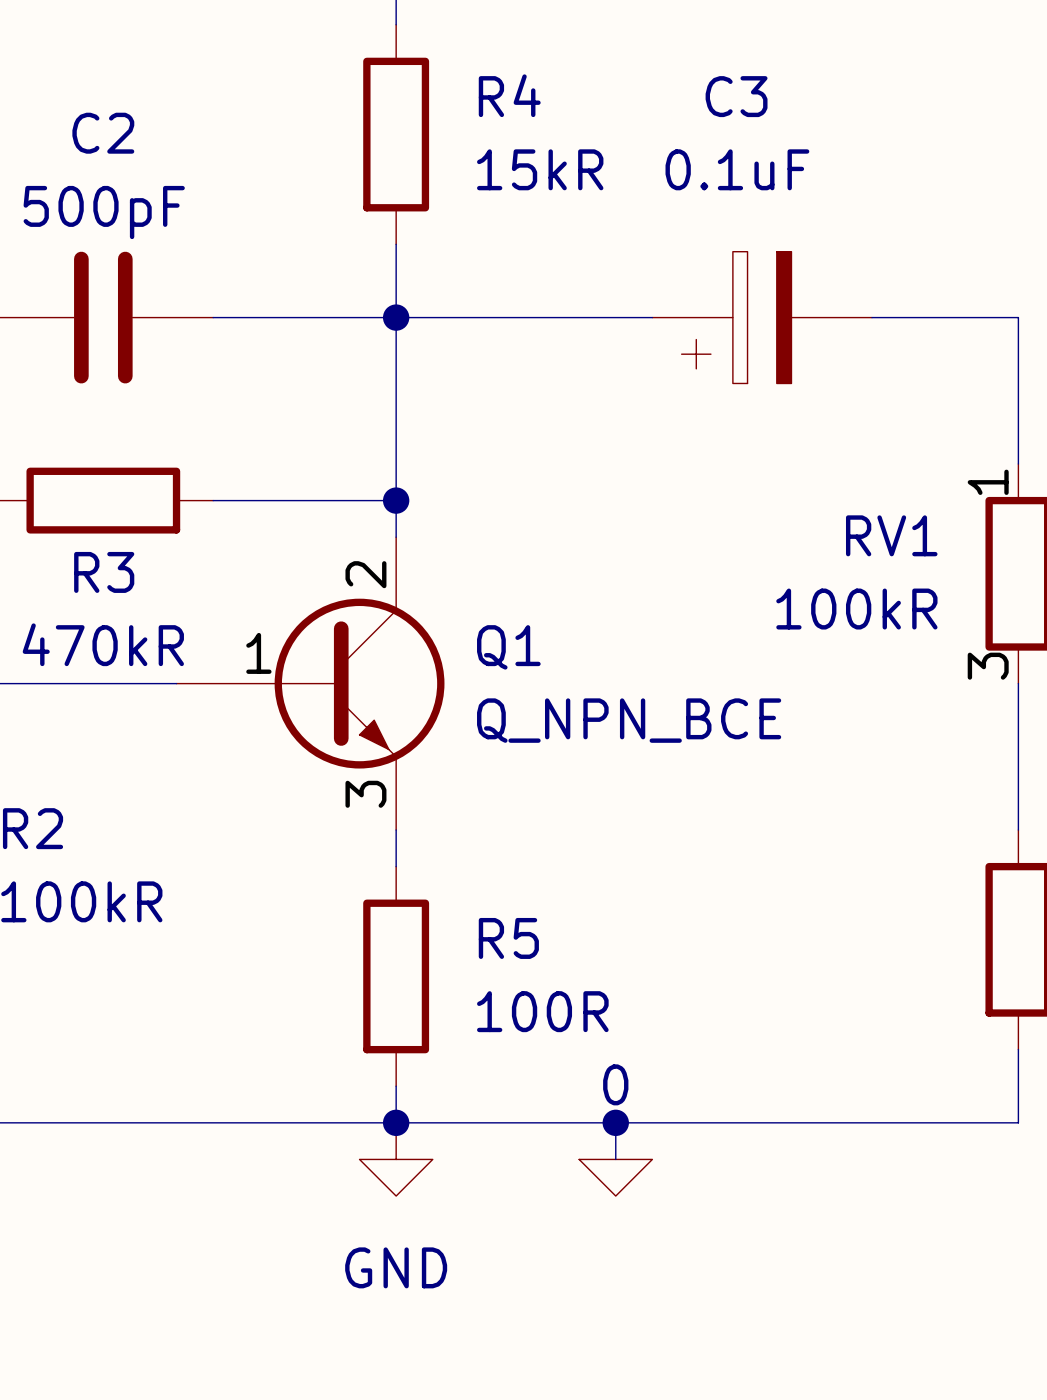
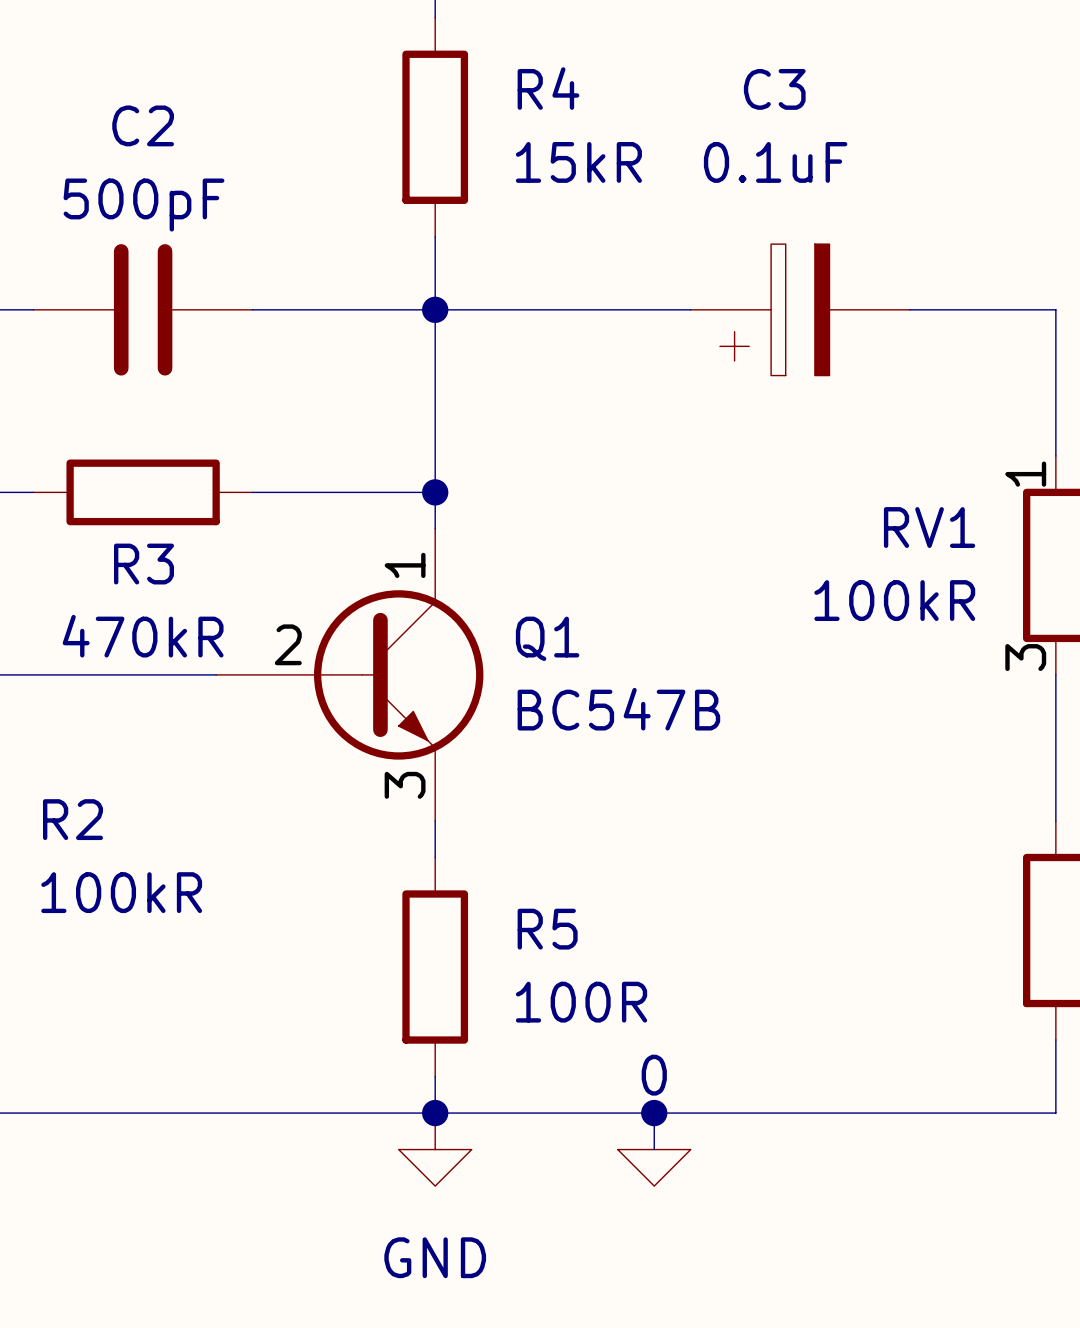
Q1 symbol: [176, 537, 445, 831] -> [216, 528, 484, 821]
Q1 value: Q_NPN_BCE (629, 720) -> BC547B (618, 709)

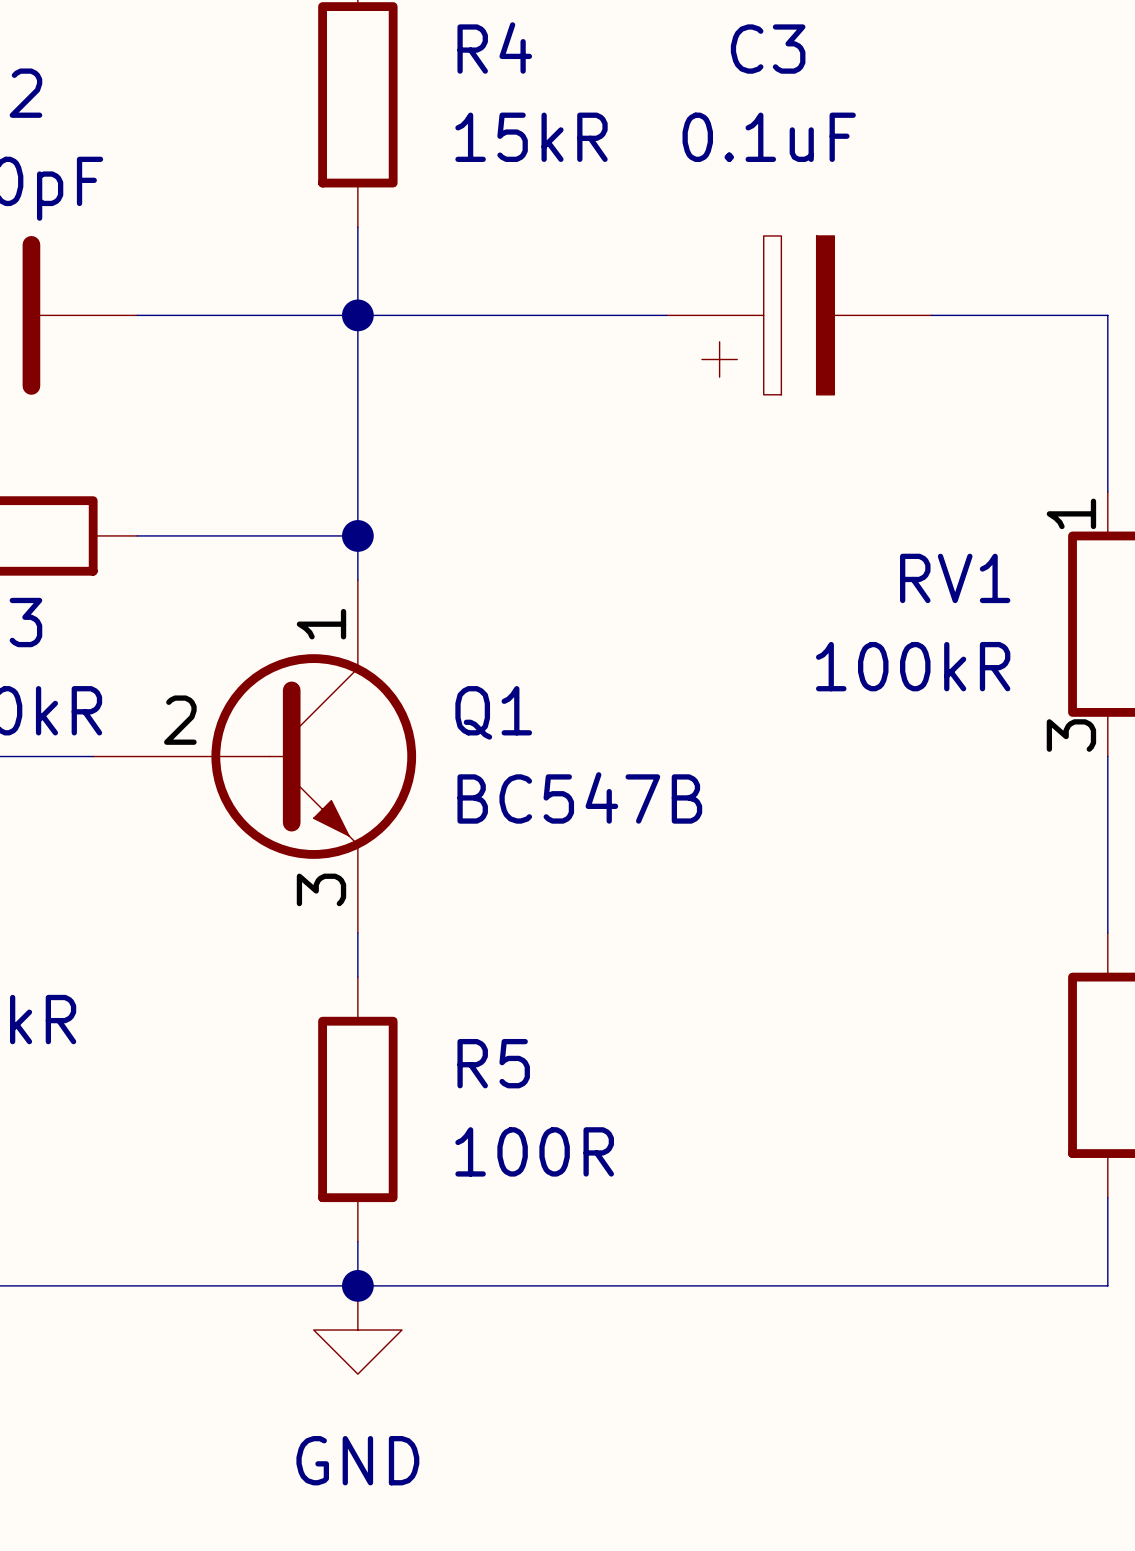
wire: (654, 1113) (654, 1149) -> none
junction: (654, 1113) -> none
power symbol: 0 (654, 1167) -> none

